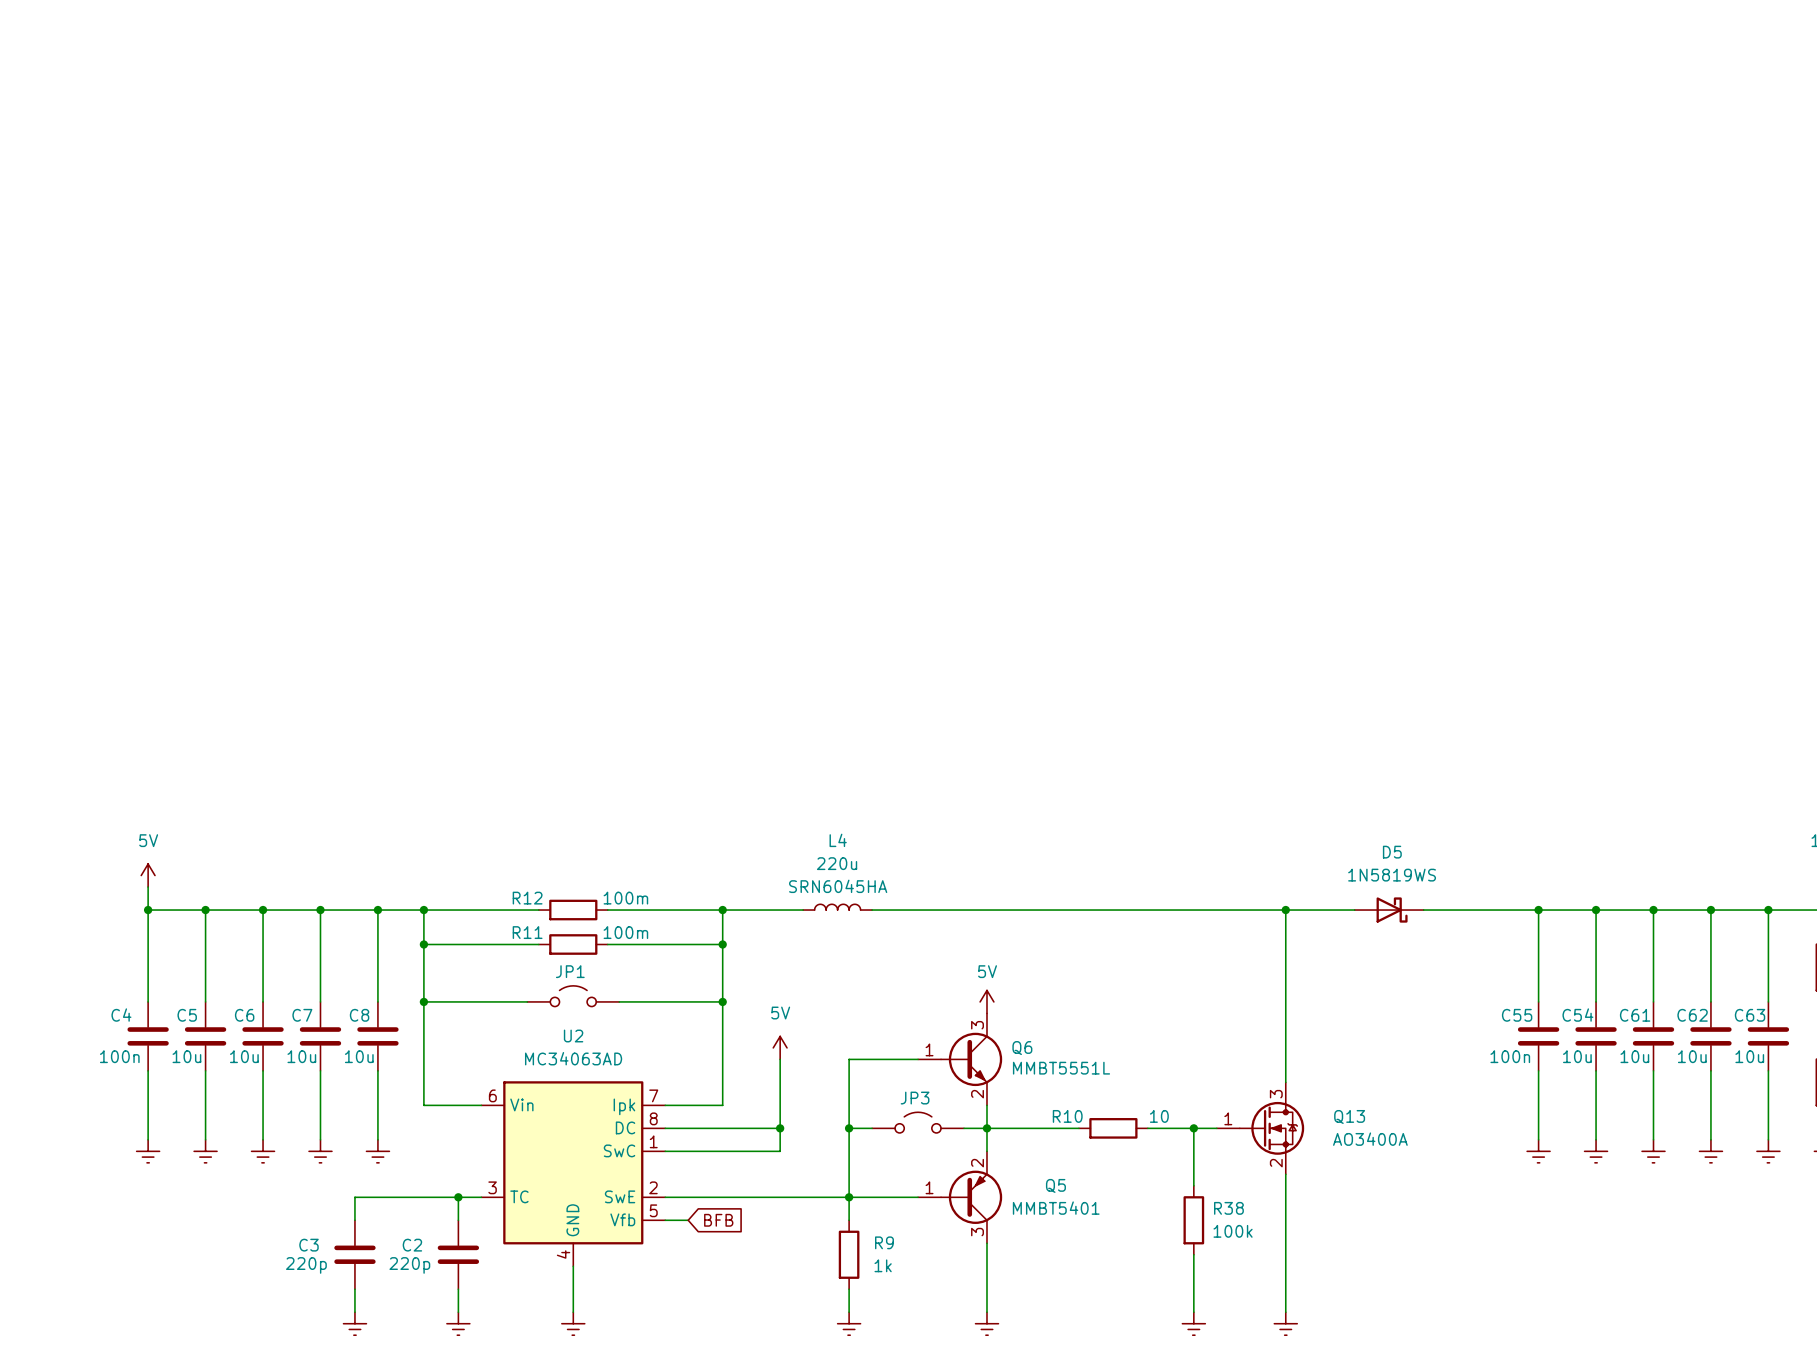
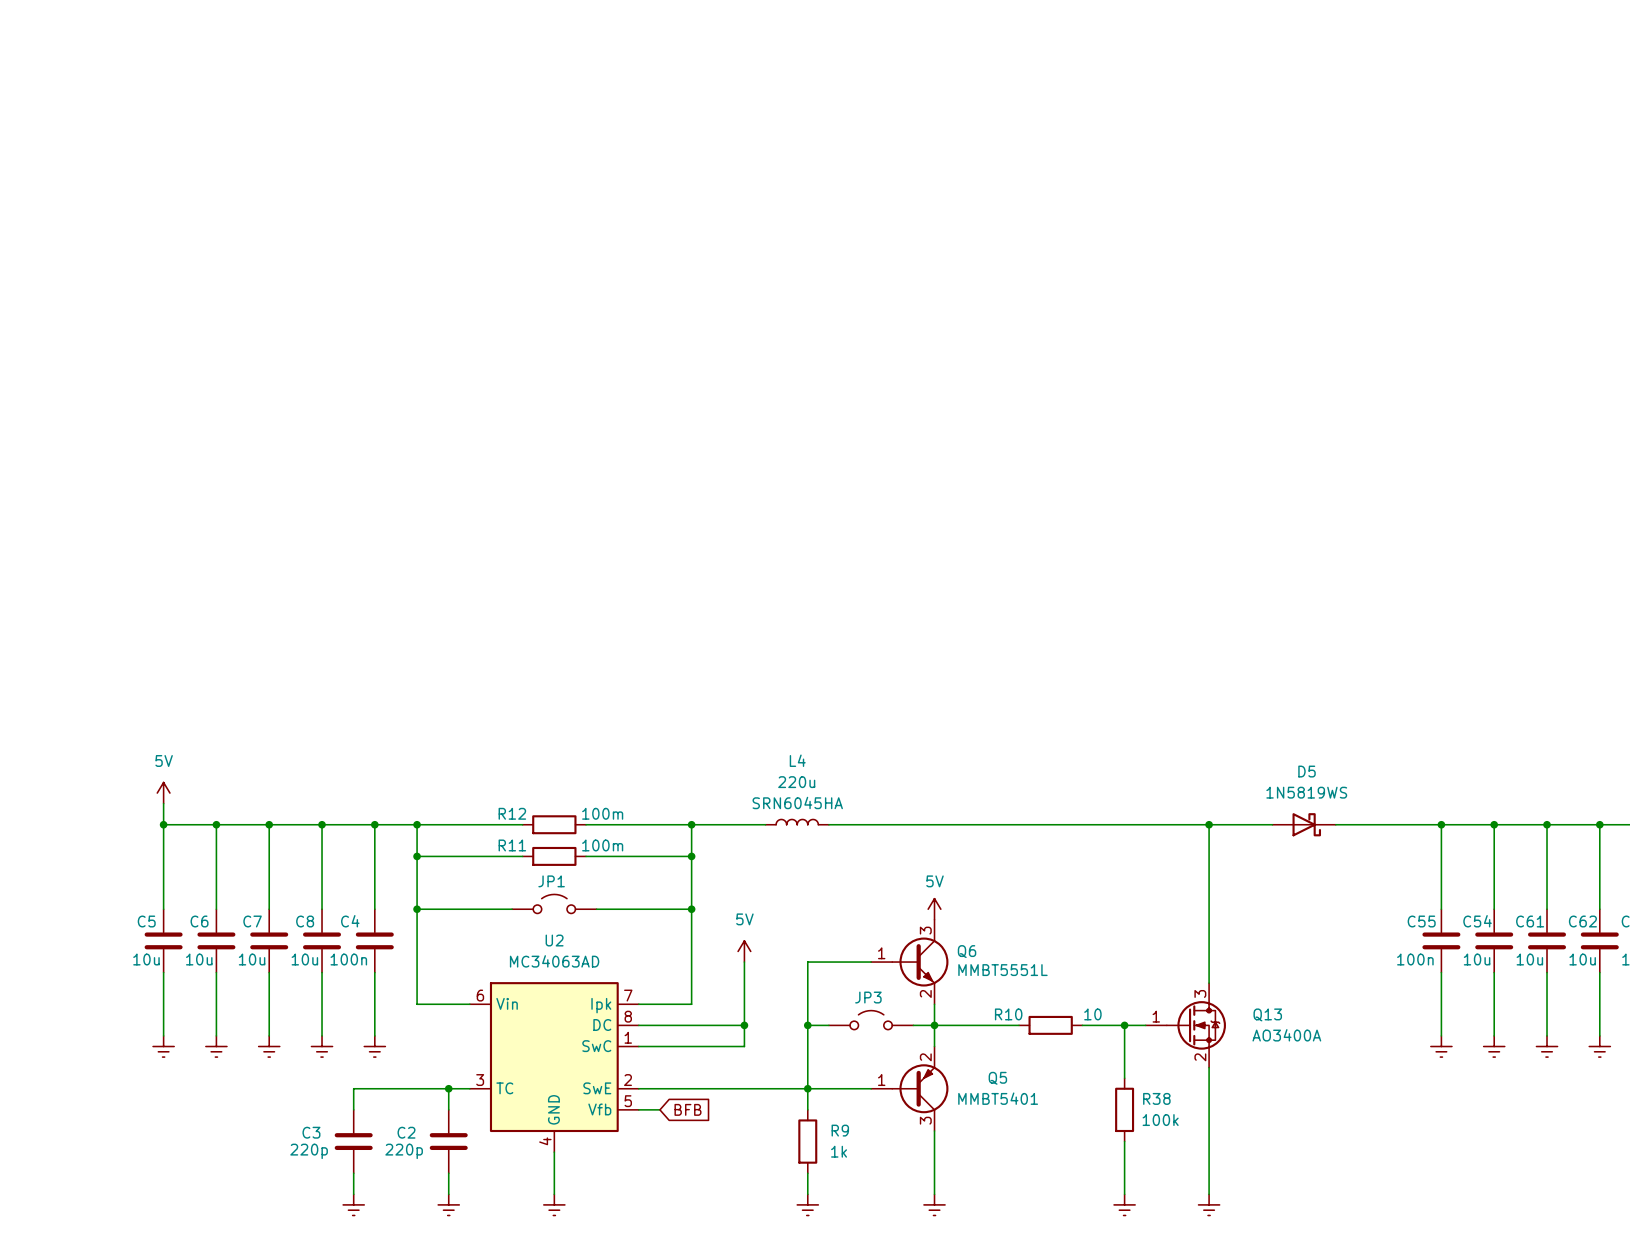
C4 name: C4 (121, 1015) -> C5 (146, 921)
C5 name: C5 (187, 1015) -> C6 (199, 921)
C6 name: C6 (244, 1015) -> C7 (252, 921)
C7 name: C7 (302, 1015) -> C8 (305, 921)
C8 name: C8 (359, 1015) -> C4 (350, 921)
C4 value: 100n (119, 1056) -> 10u (146, 959)
C8 value: 10u (359, 1056) -> 100n (348, 959)

